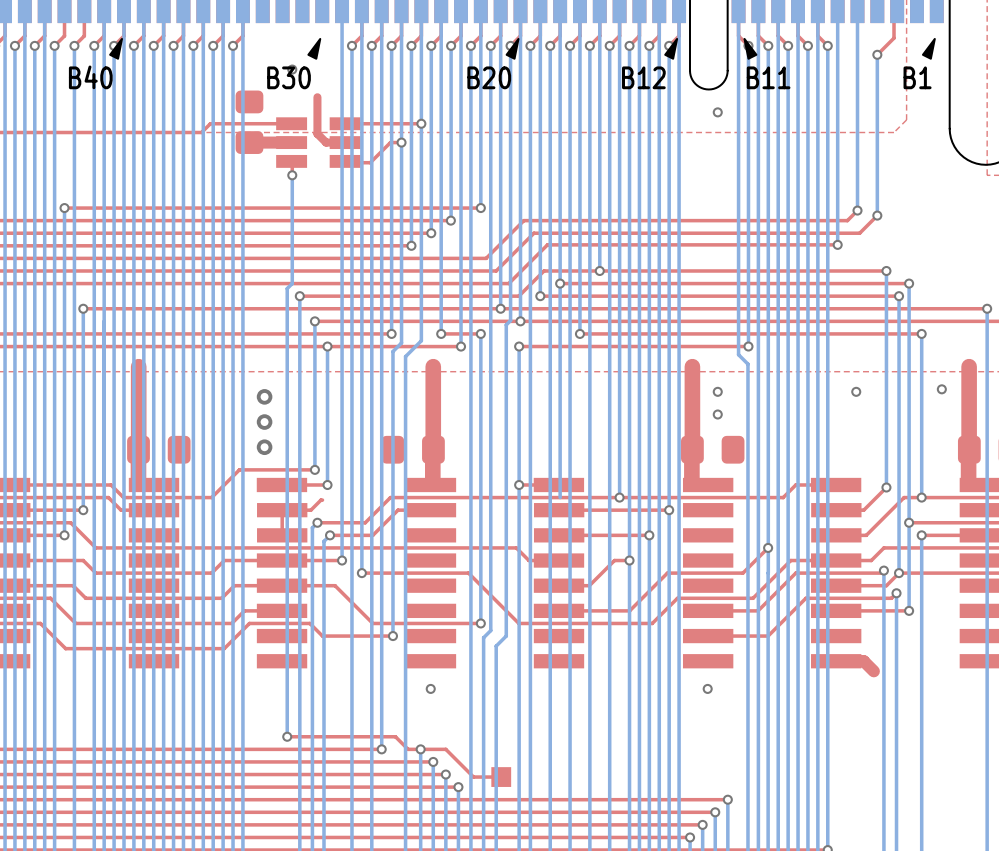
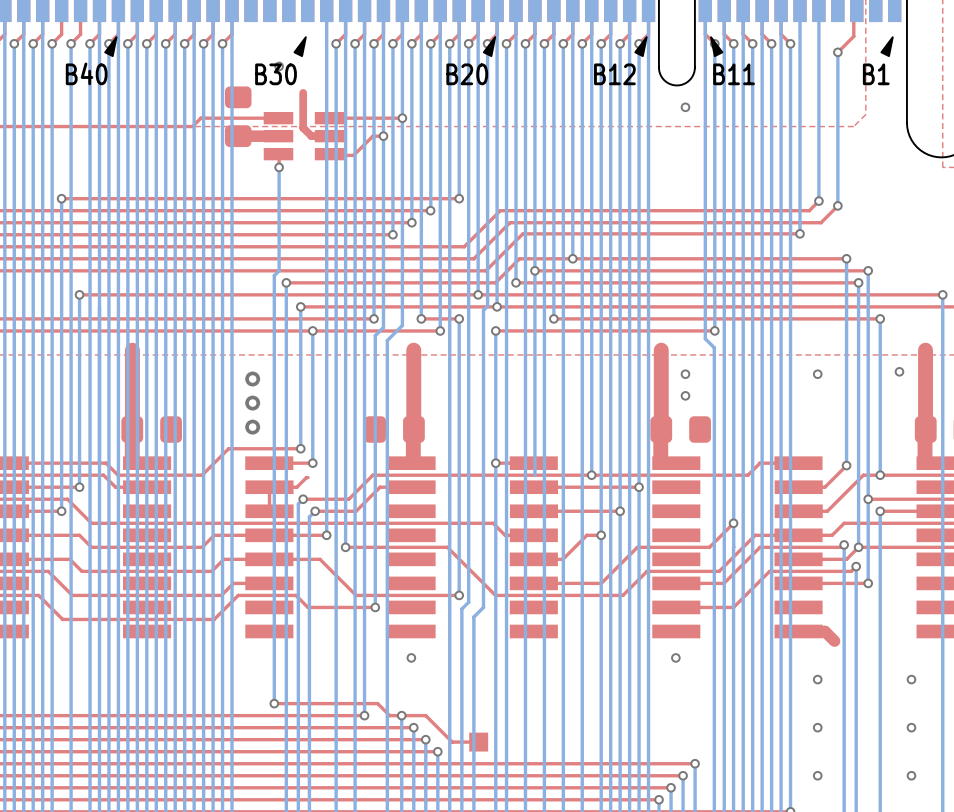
via: none -> (817, 679)
via: none -> (911, 679)
via: none -> (817, 727)
via: none -> (911, 727)
via: none -> (817, 775)
via: none -> (911, 775)

